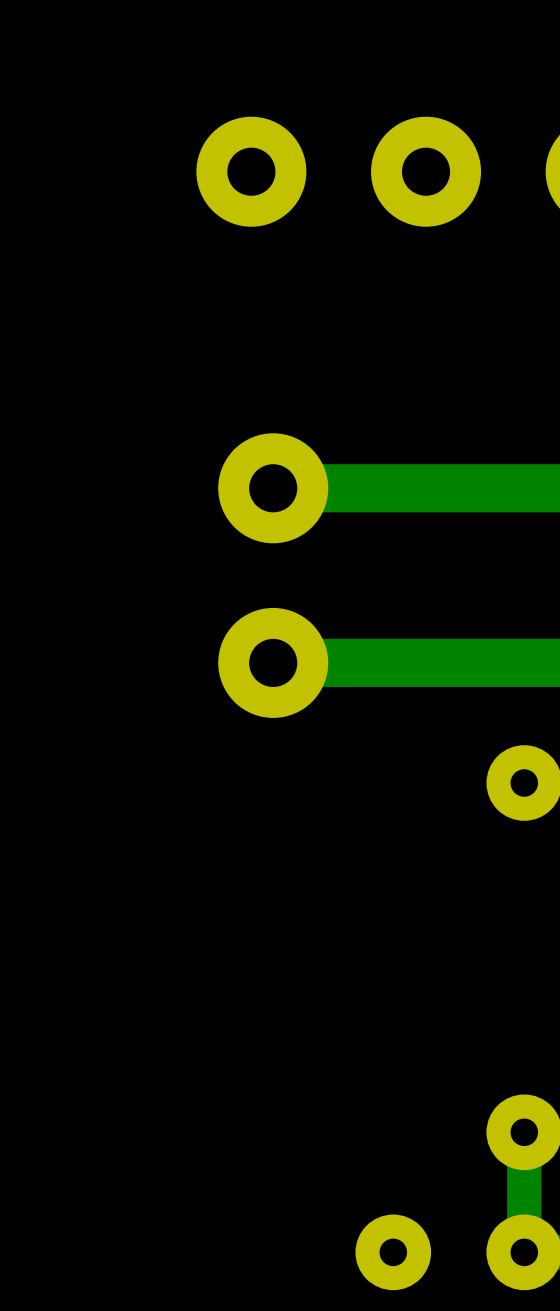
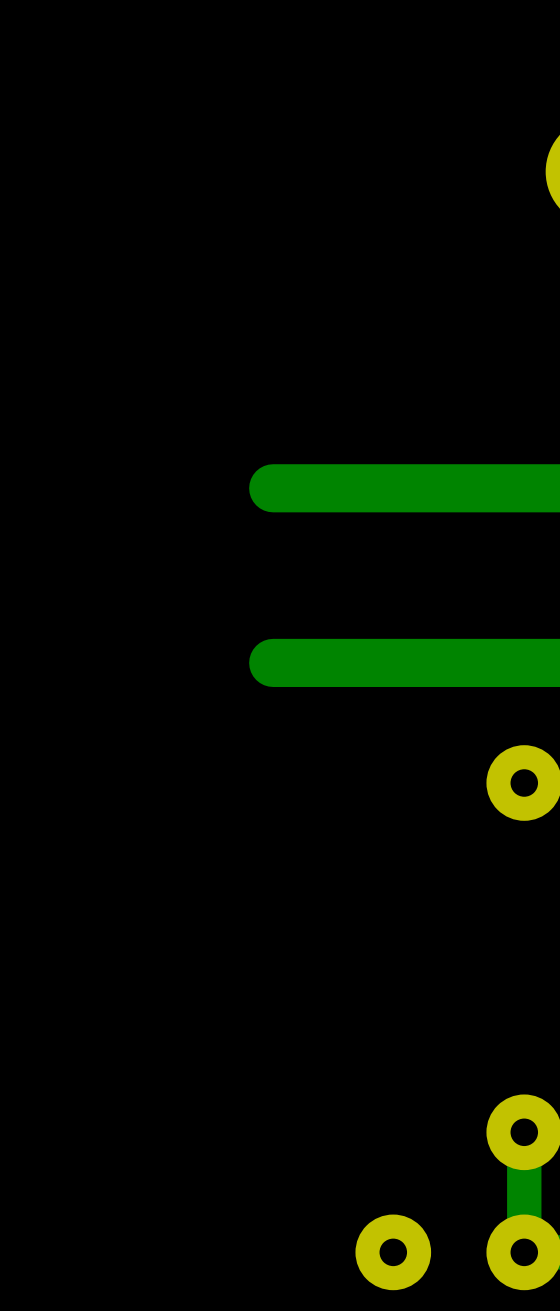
part: (251, 171) -> none
part: (426, 171) -> none
part: (273, 488) -> none
part: (273, 662) -> none

